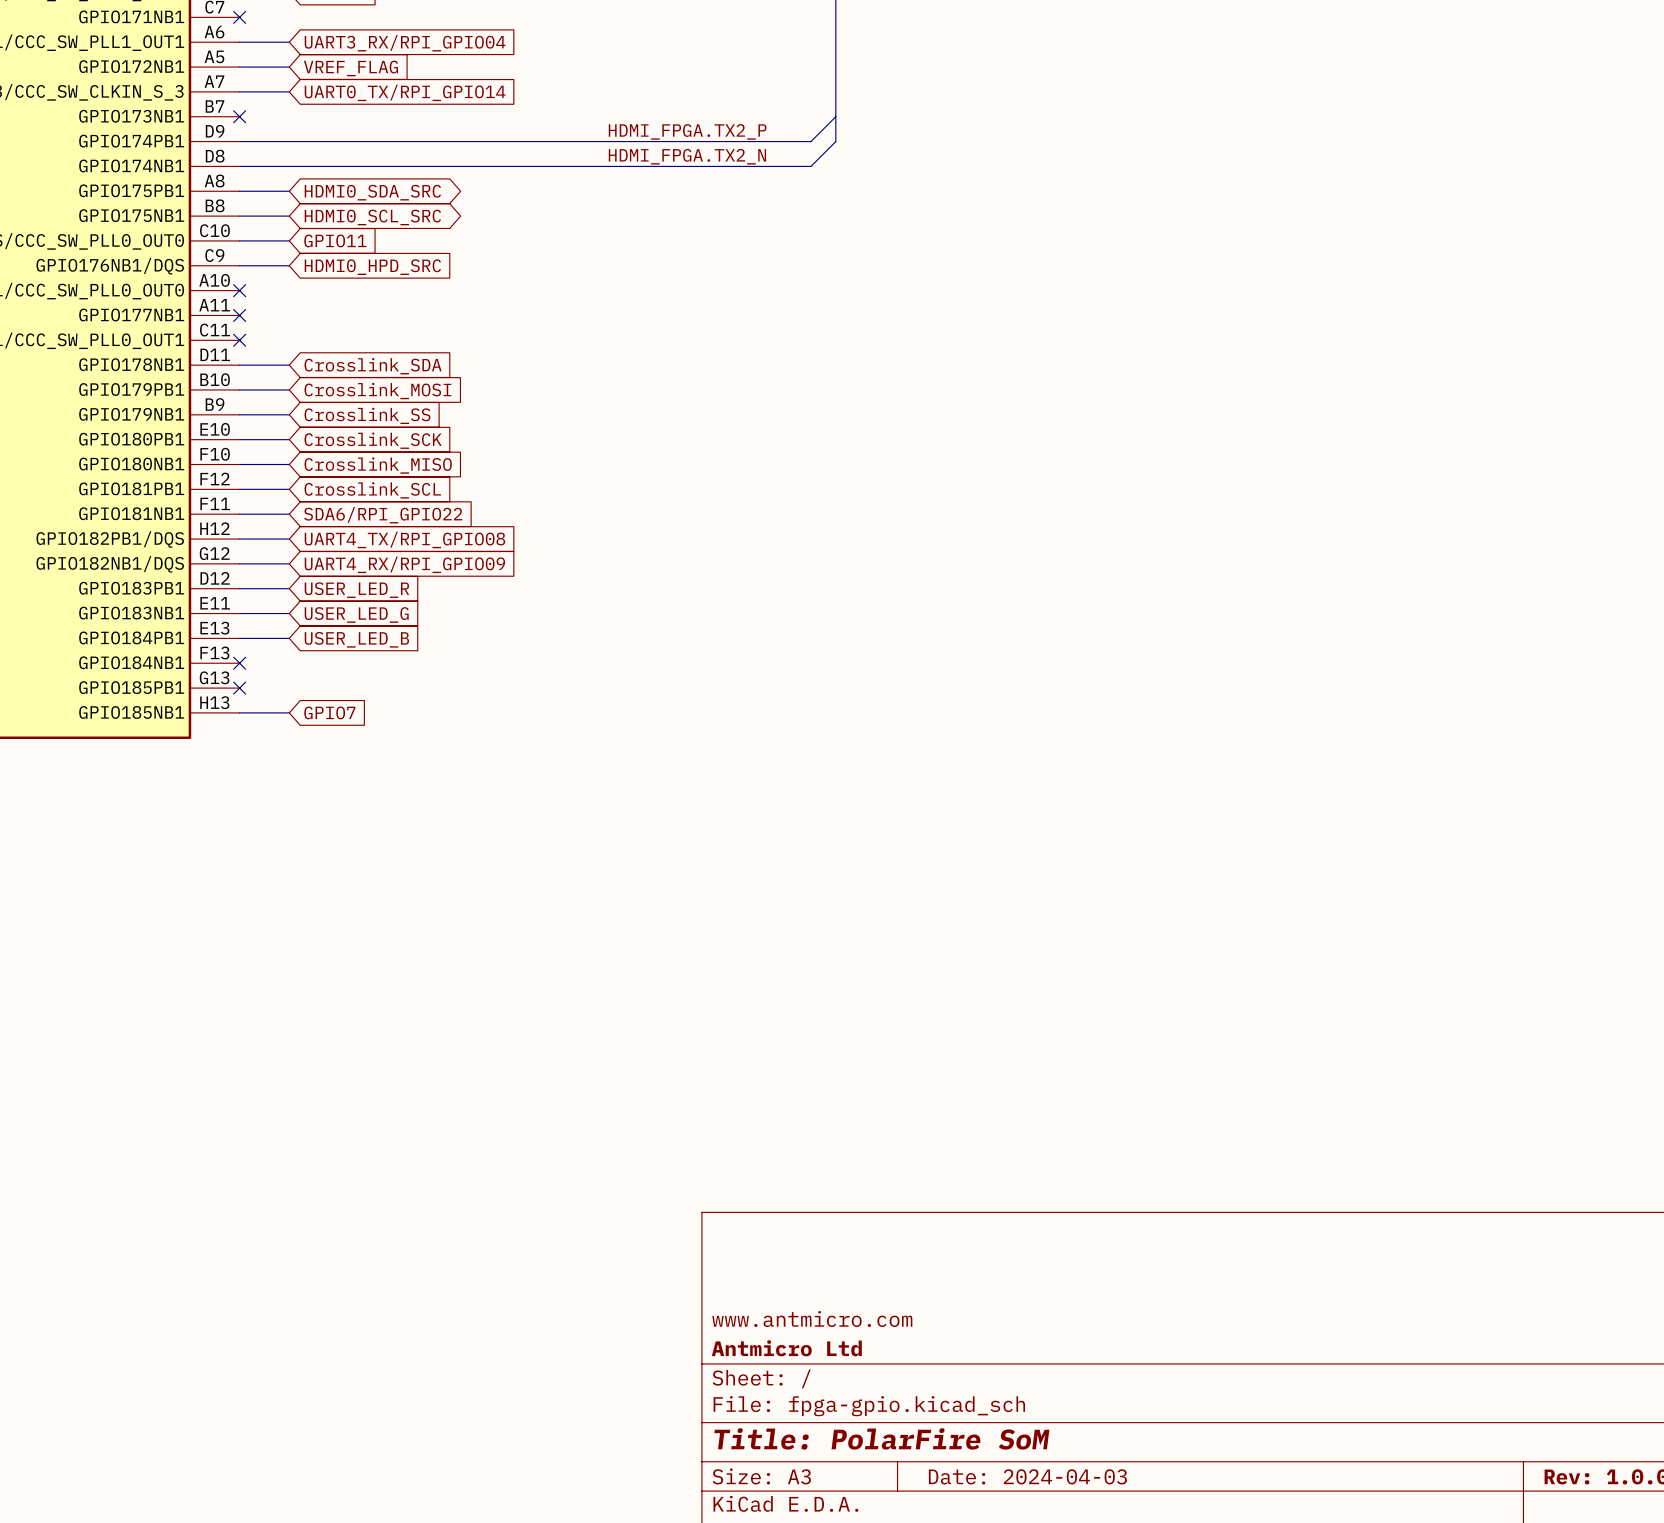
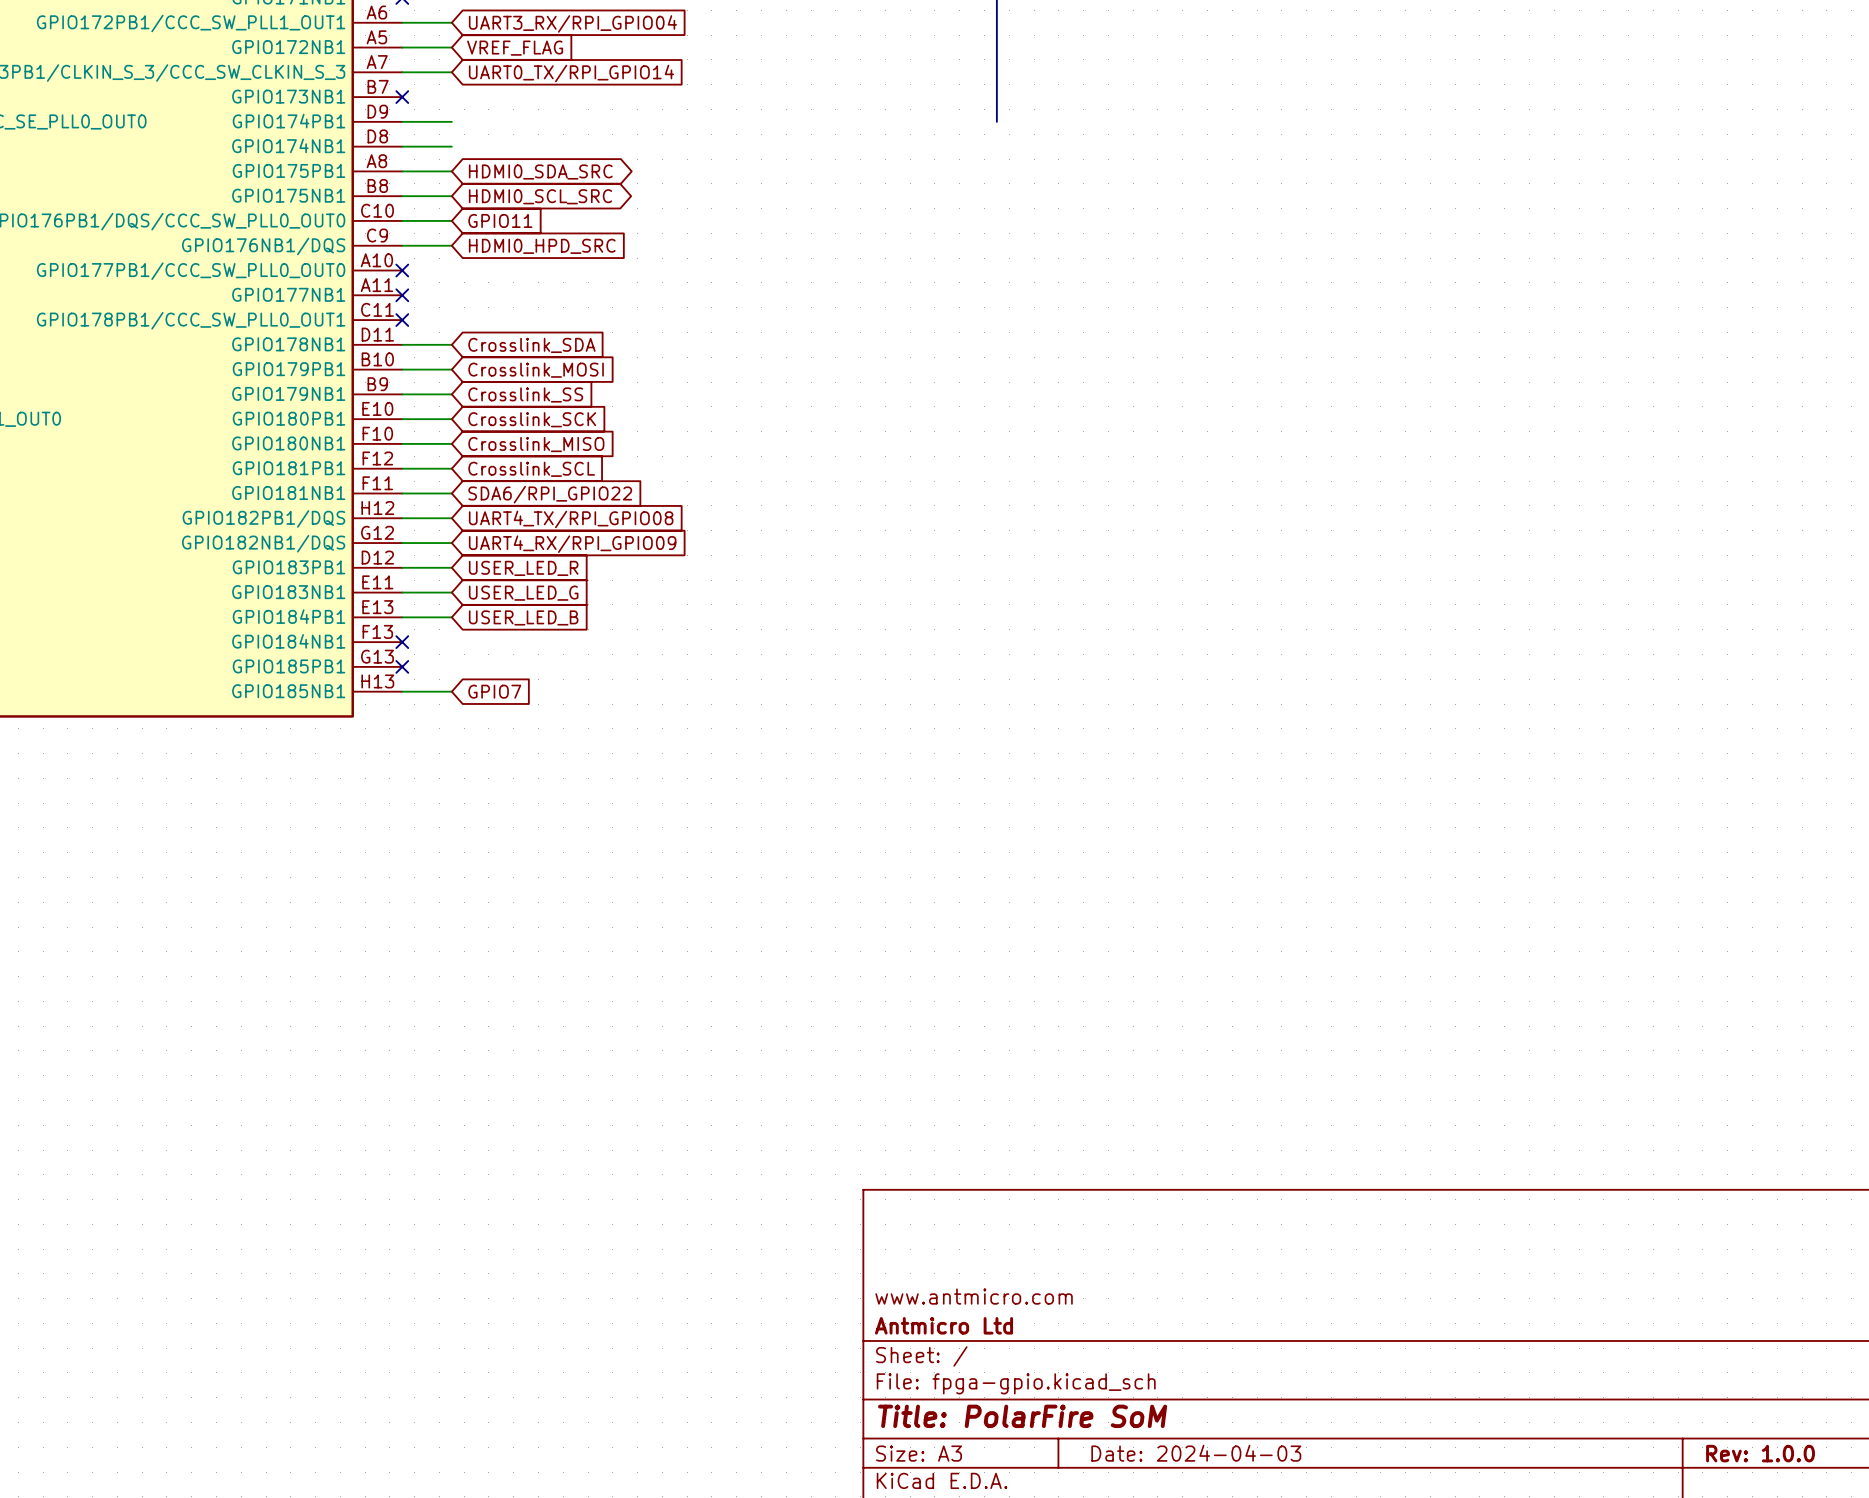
wire: (835, 116) (810, 141) (289, 141) -> none
label: HDMI_FPGA.TX2_P (687, 131) -> none
wire: (835, 141) (810, 166) (289, 166) -> none
label: HDMI_FPGA.TX2_N (687, 156) -> none

